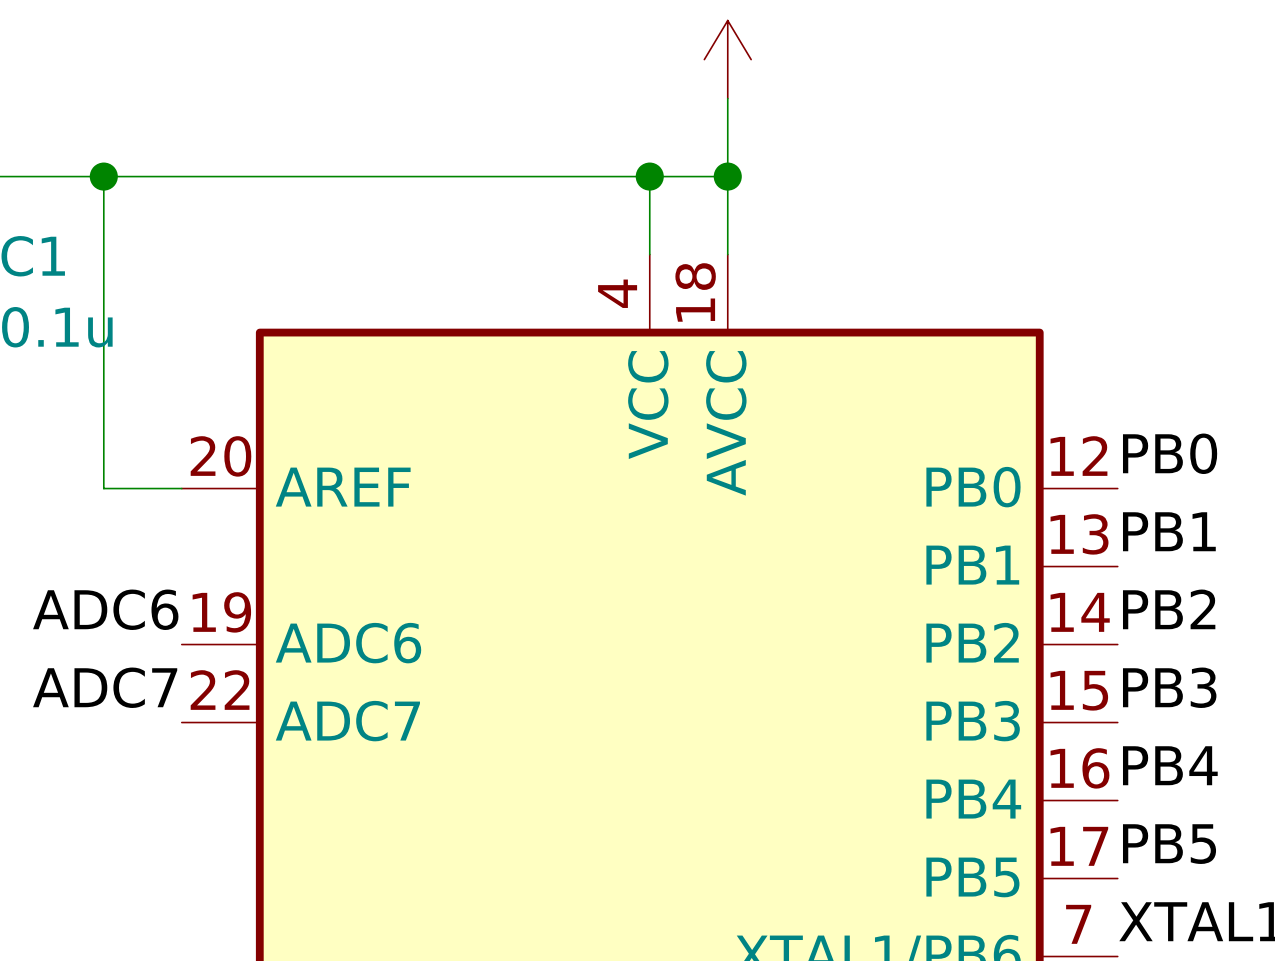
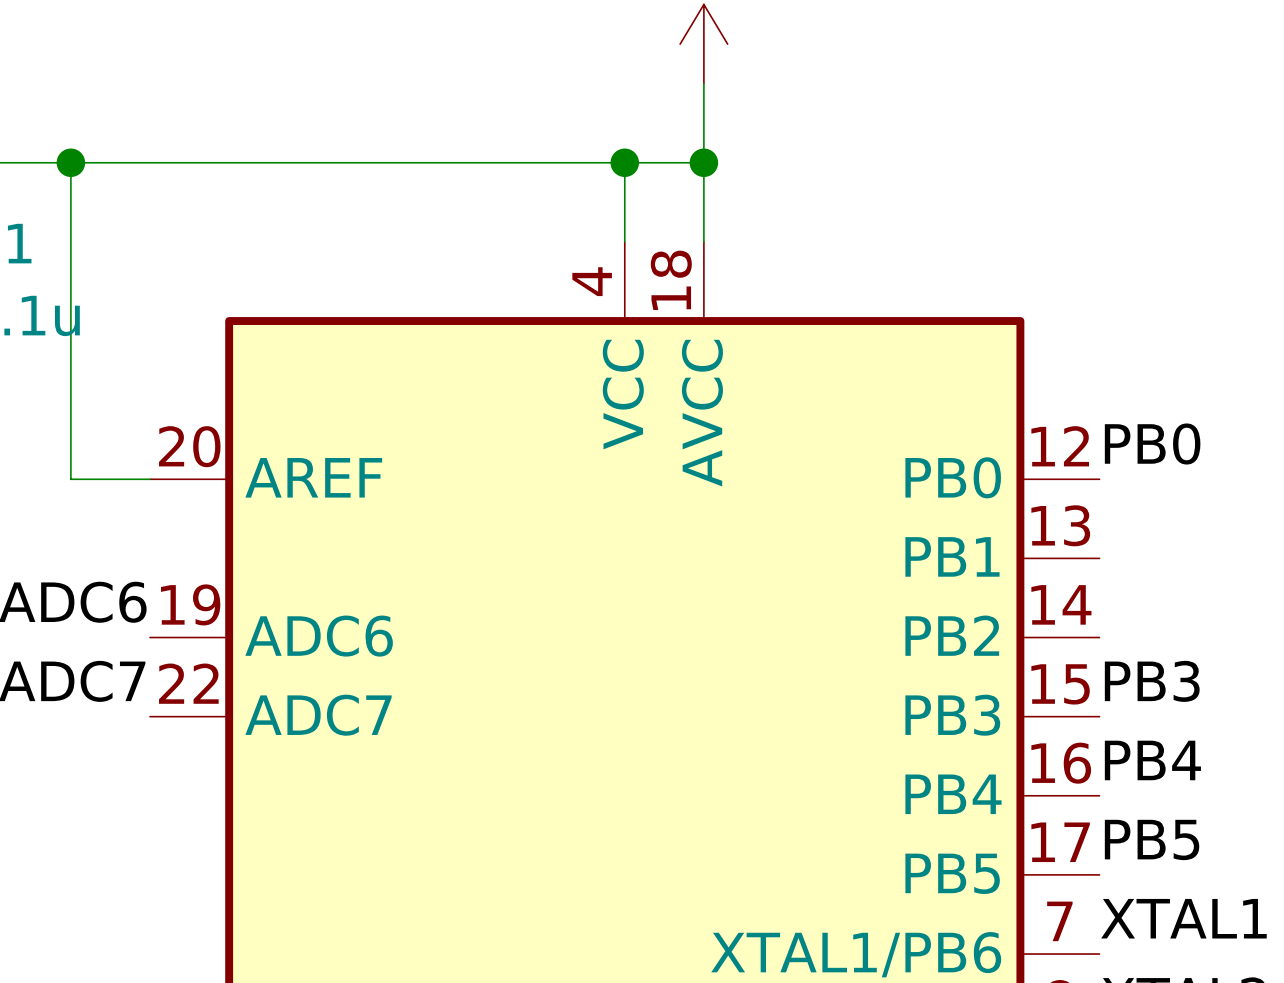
label: PB1 (1169, 531) -> none
label: PB2 (1169, 609) -> none

